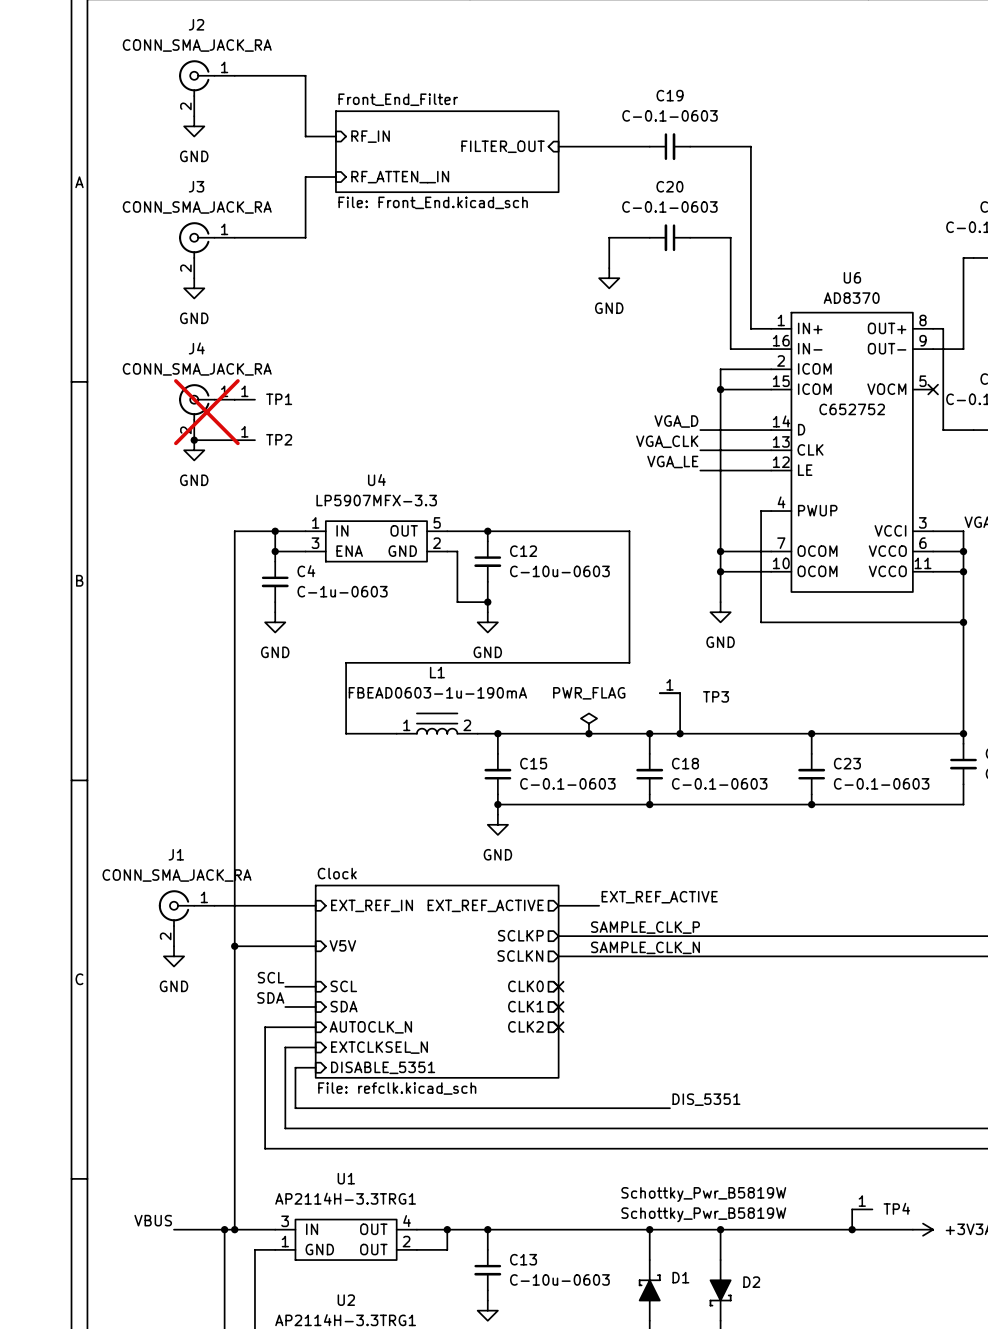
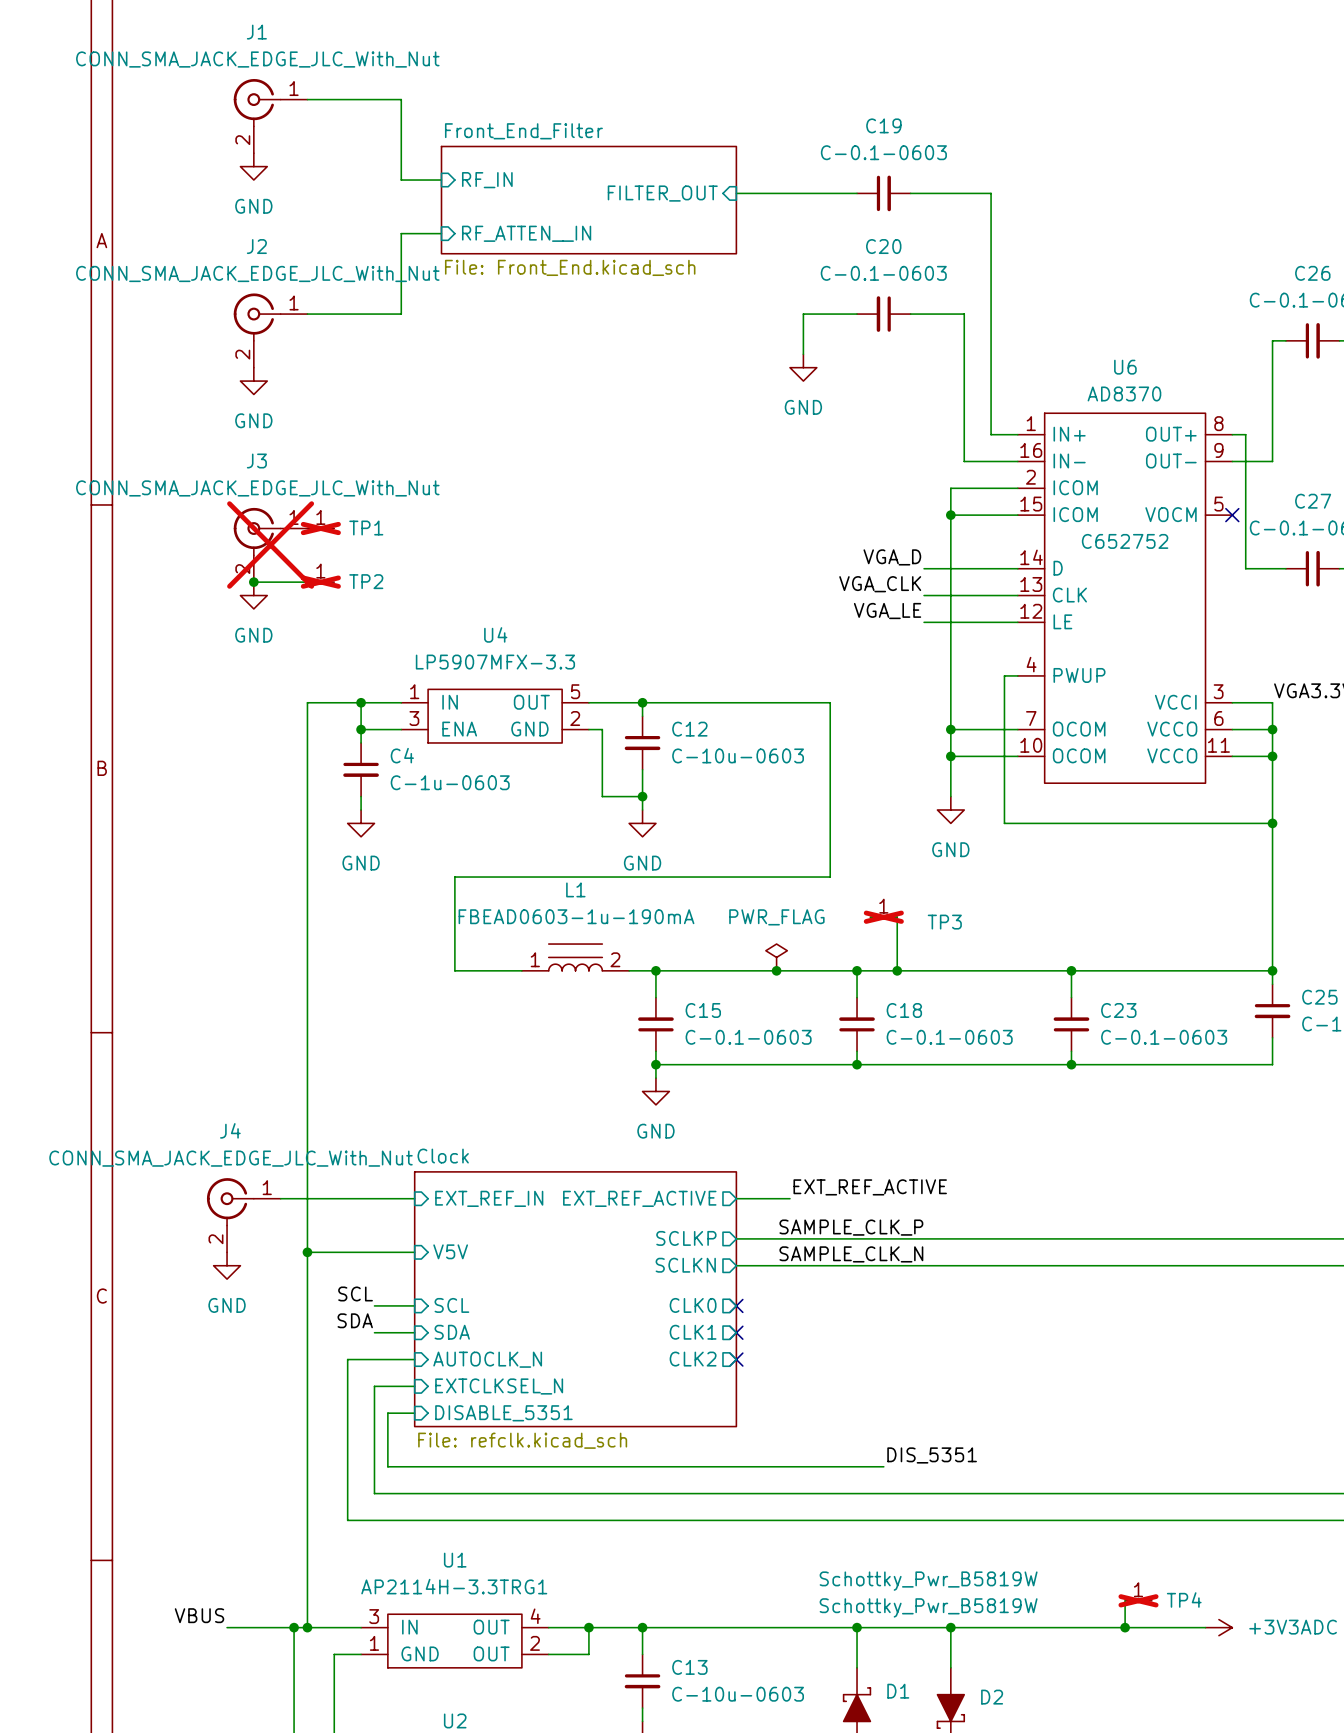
J2 name: J2 (196, 24) -> J1 (256, 32)
J2 value: CONN_SMA_JACK_RA (197, 45) -> CONN_SMA_JACK_EDGE_JLC_With_Nut (257, 59)
J3 name: J3 (196, 186) -> J2 (256, 246)
J3 value: CONN_SMA_JACK_RA (197, 207) -> CONN_SMA_JACK_EDGE_JLC_With_Nut (257, 273)
J4 name: J4 (196, 348) -> J3 (256, 460)
J4 value: CONN_SMA_JACK_RA (197, 369) -> CONN_SMA_JACK_EDGE_JLC_With_Nut (257, 488)
TP1 do-not-place cross: none -> (320, 528)
TP2 do-not-place cross: none -> (320, 582)
TP3 do-not-place cross: none -> (883, 917)
J1 name: J1 (176, 854) -> J4 (230, 1130)
J1 value: CONN_SMA_JACK_RA (177, 875) -> CONN_SMA_JACK_EDGE_JLC_With_Nut (231, 1158)
TP4 do-not-place cross: none -> (1138, 1600)

